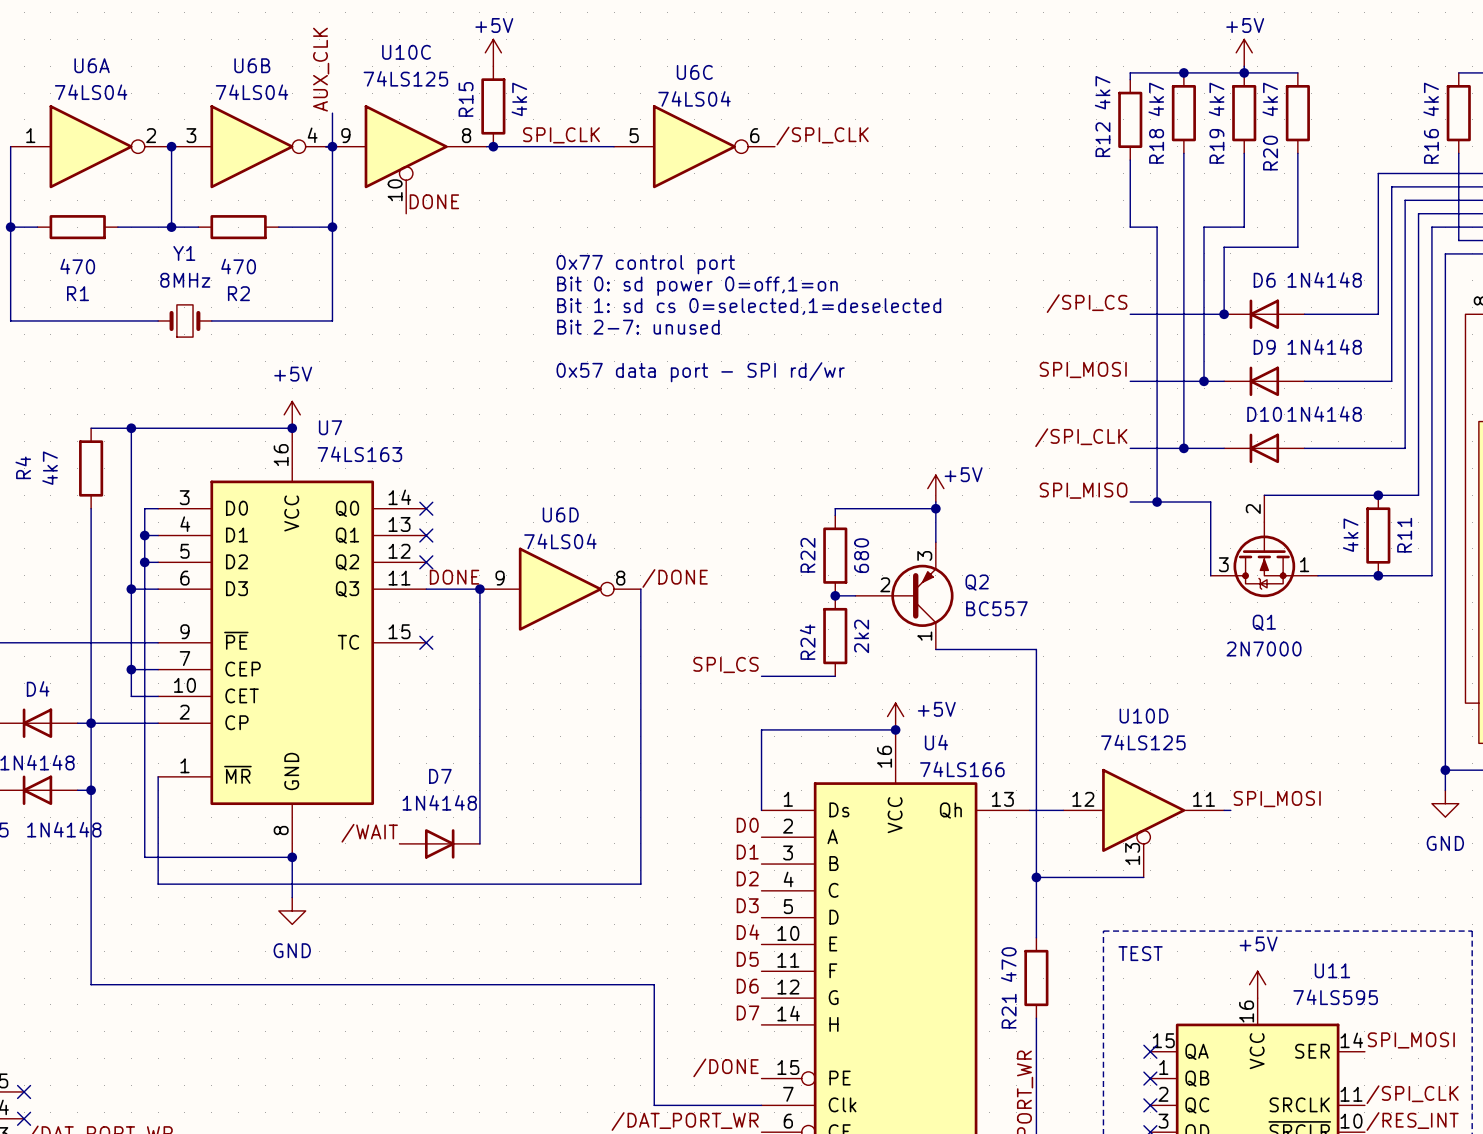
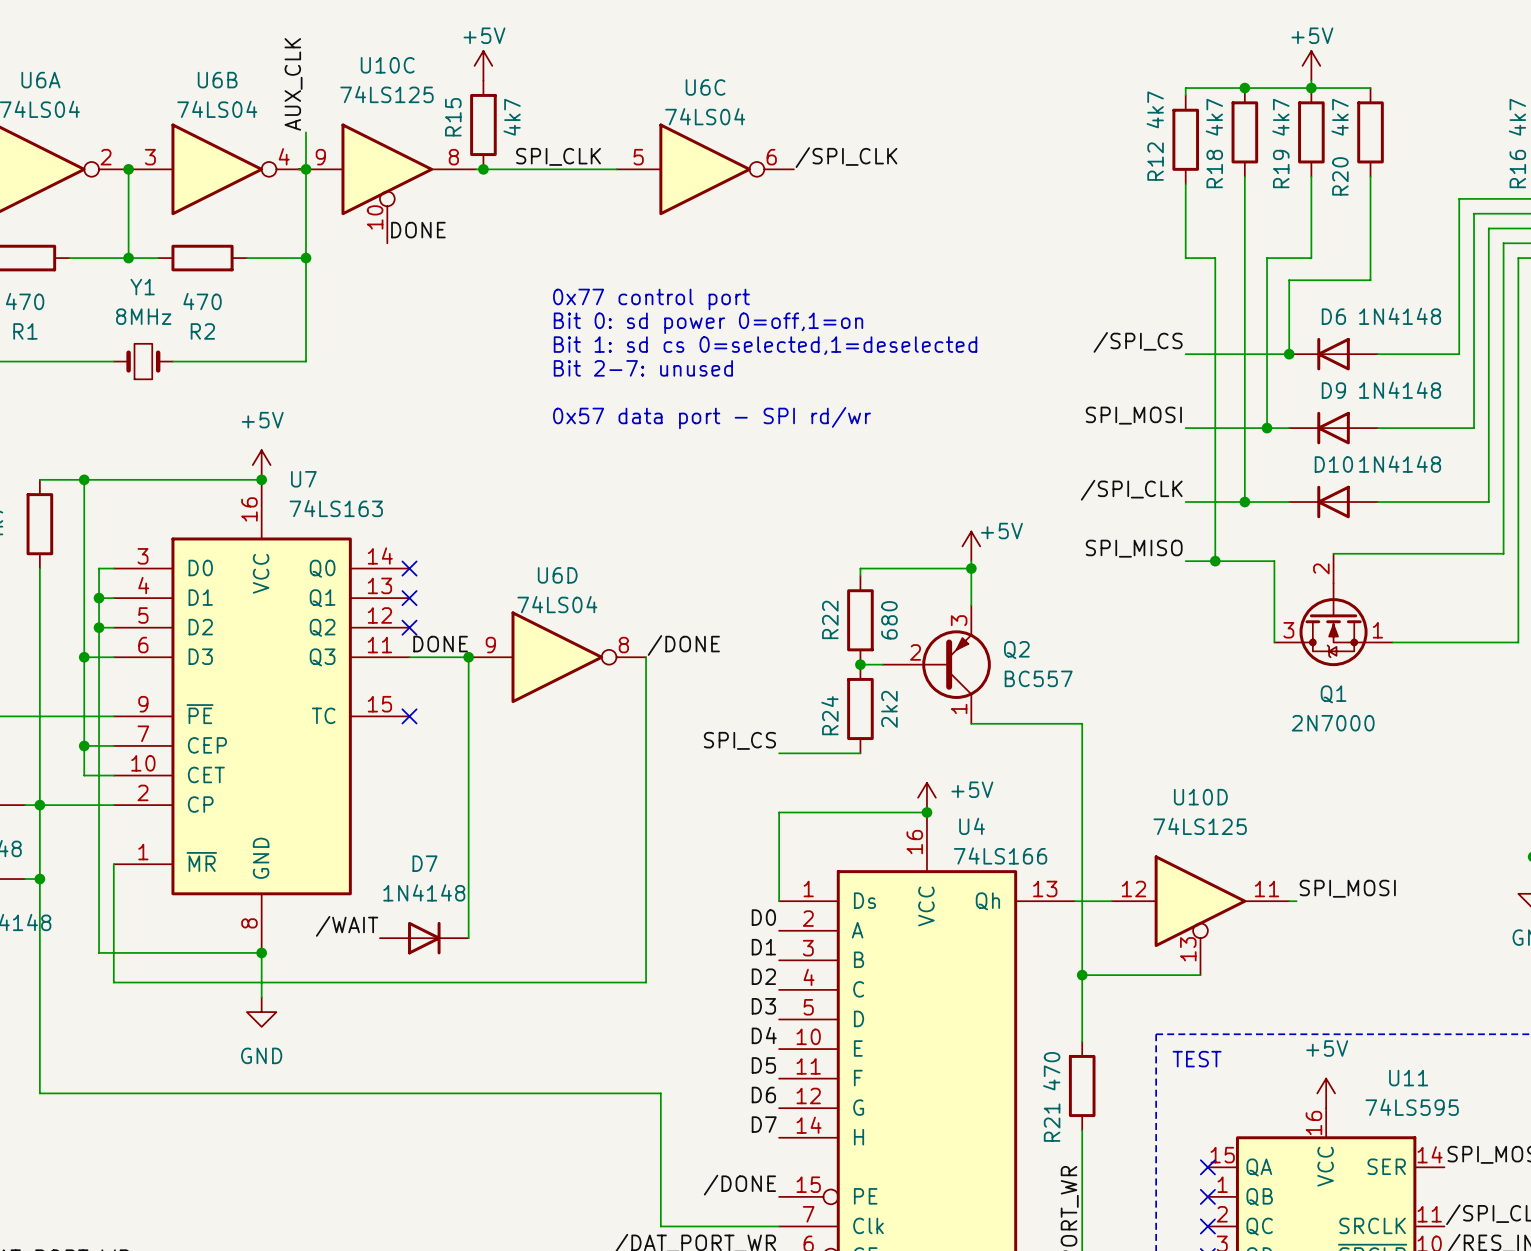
junction: (1378, 495) -> none
R11: 4k7 (1378, 535) -> none
junction: (1378, 575) -> none

